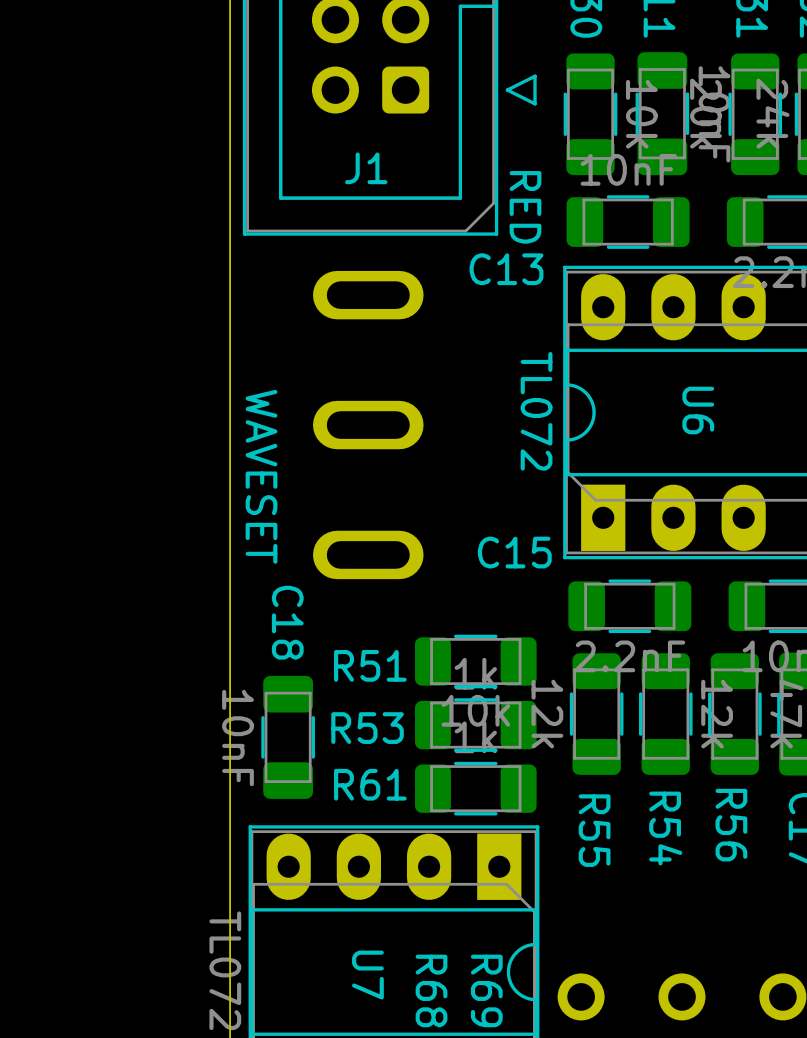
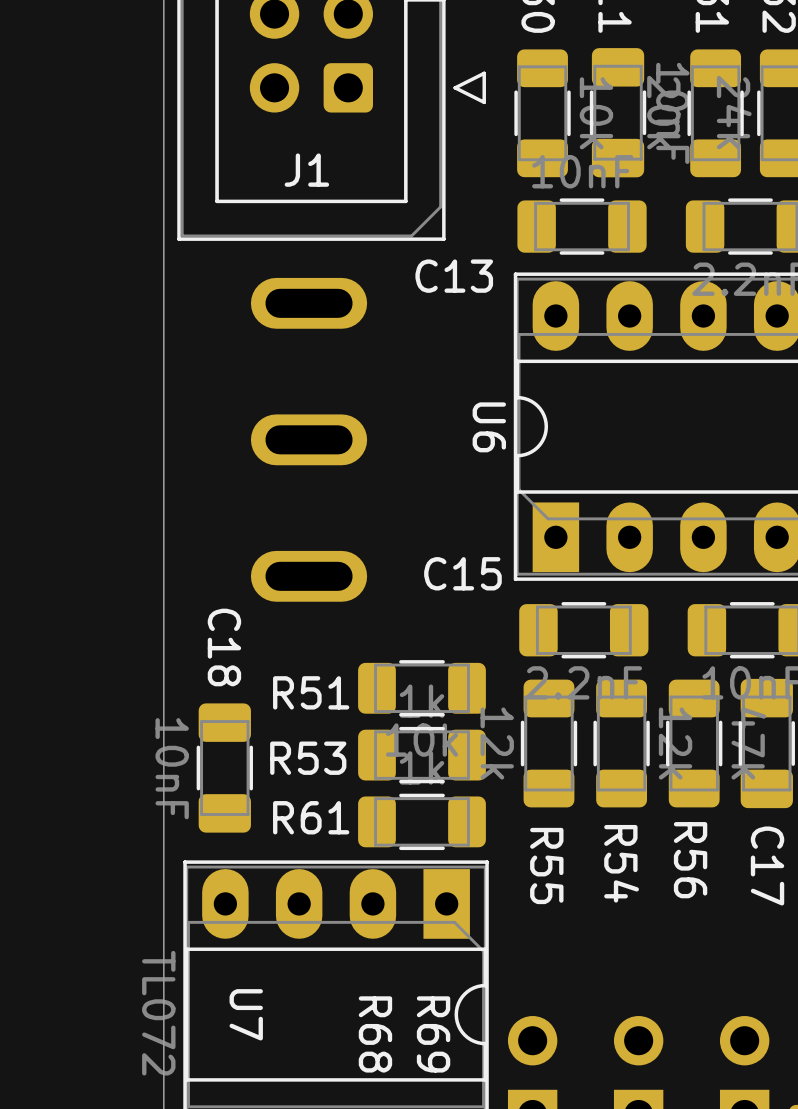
text: RED (525, 207) -> none
U6 name position: U6 (698, 410) -> U6 (489, 427)
text: TL072 (536, 411) -> none
text: WAVESET (261, 476) -> none
U7 name position: U7 (367, 975) -> U7 (246, 1014)

